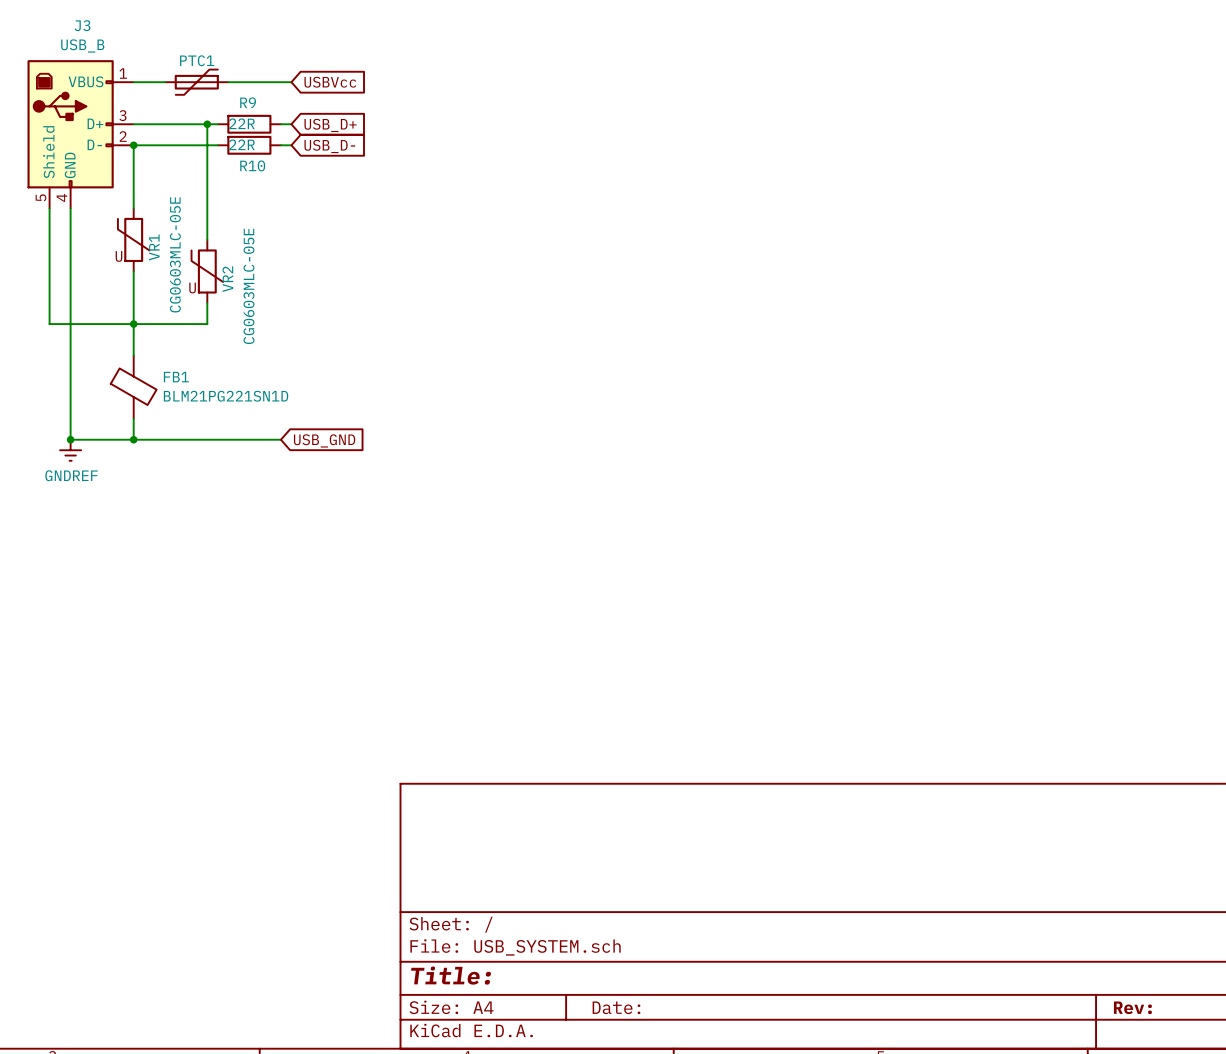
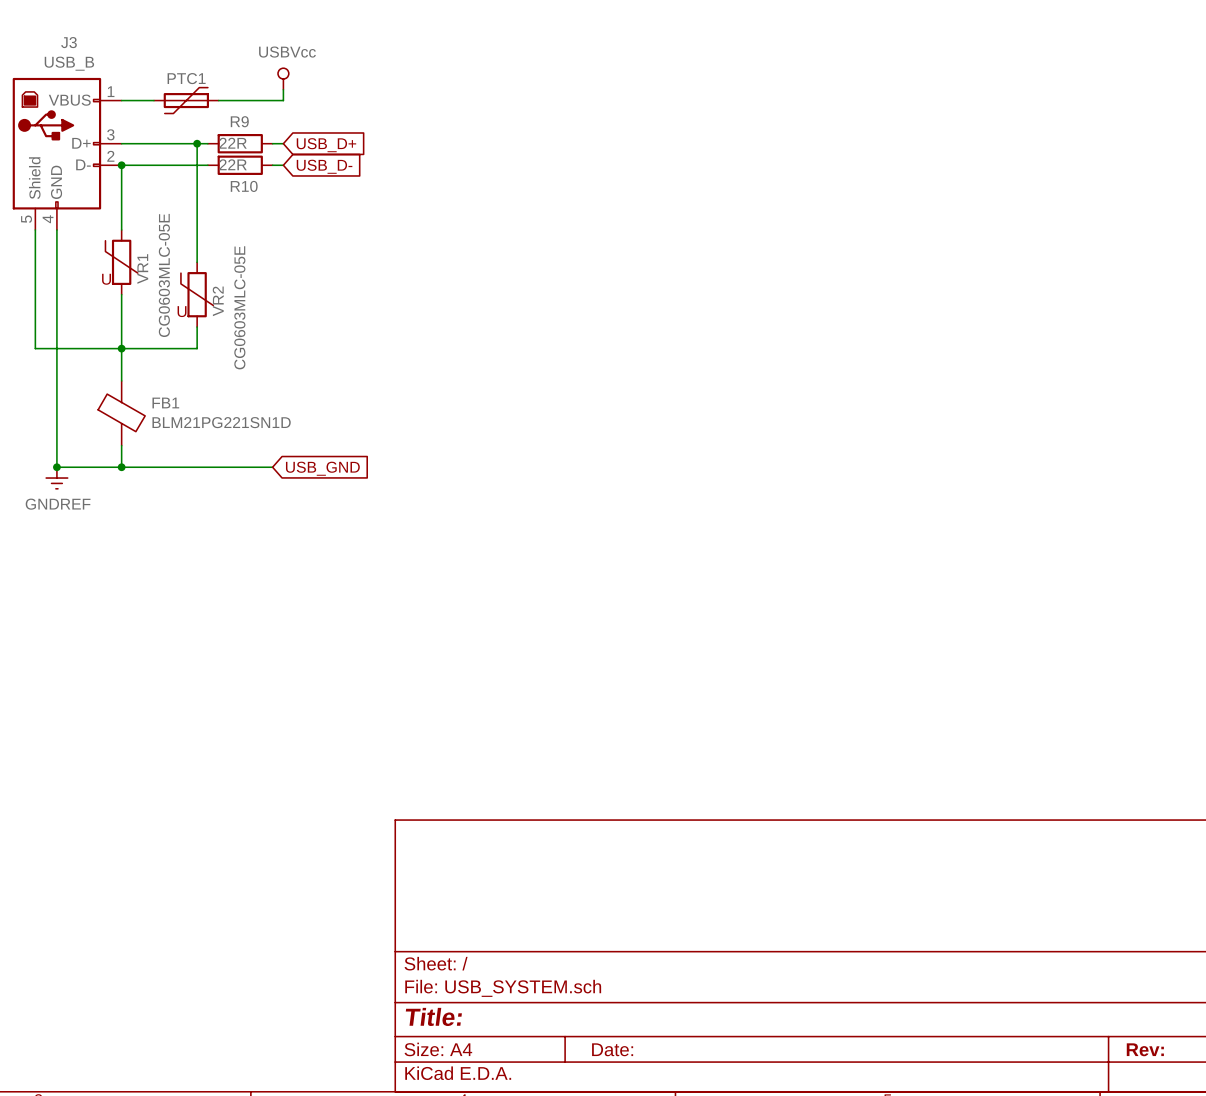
power symbol: none -> USBVcc (283, 78)
wire: none -> (283, 89) (283, 100)
global label: USBVcc (330, 82) -> none

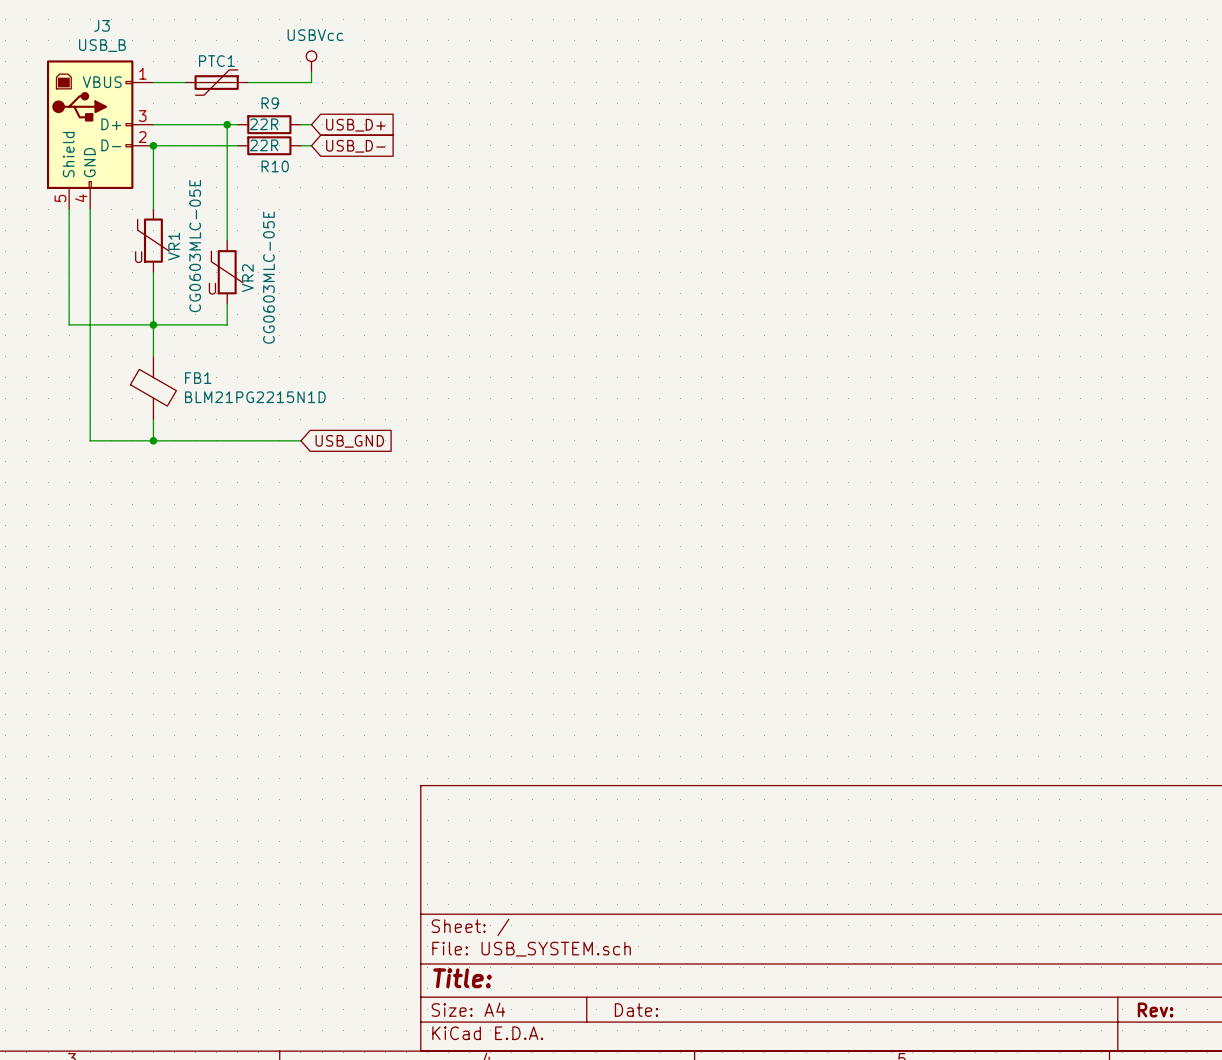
FB1 value: BLM21PG221SN1D (221, 422) -> BLM21PG2215N1D (255, 397)
junction: (56, 467) -> none
power symbol: GNDREF (56, 478) -> none

